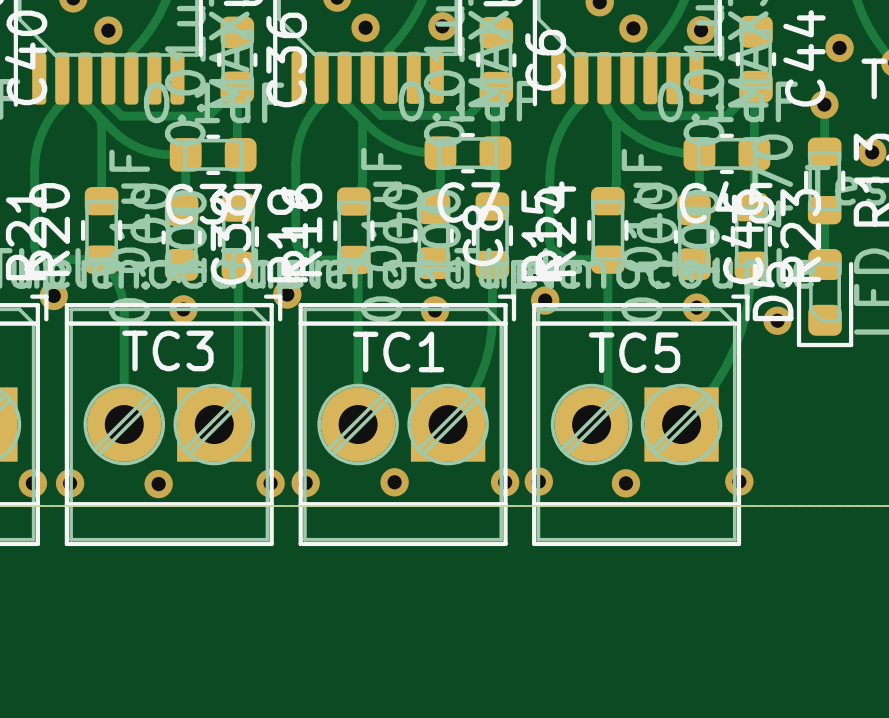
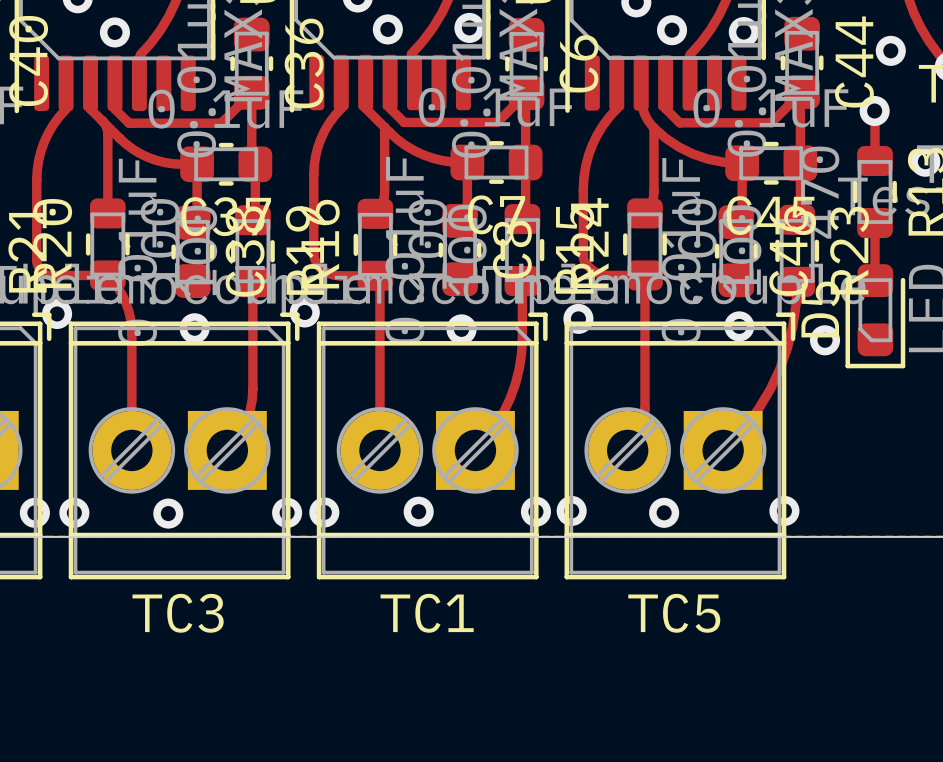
TC3 name position: TC3 (167, 350) -> TC3 (178, 613)
TC1 name position: TC1 (398, 352) -> TC1 (427, 613)
TC5 name position: TC5 (634, 352) -> TC5 (674, 613)

